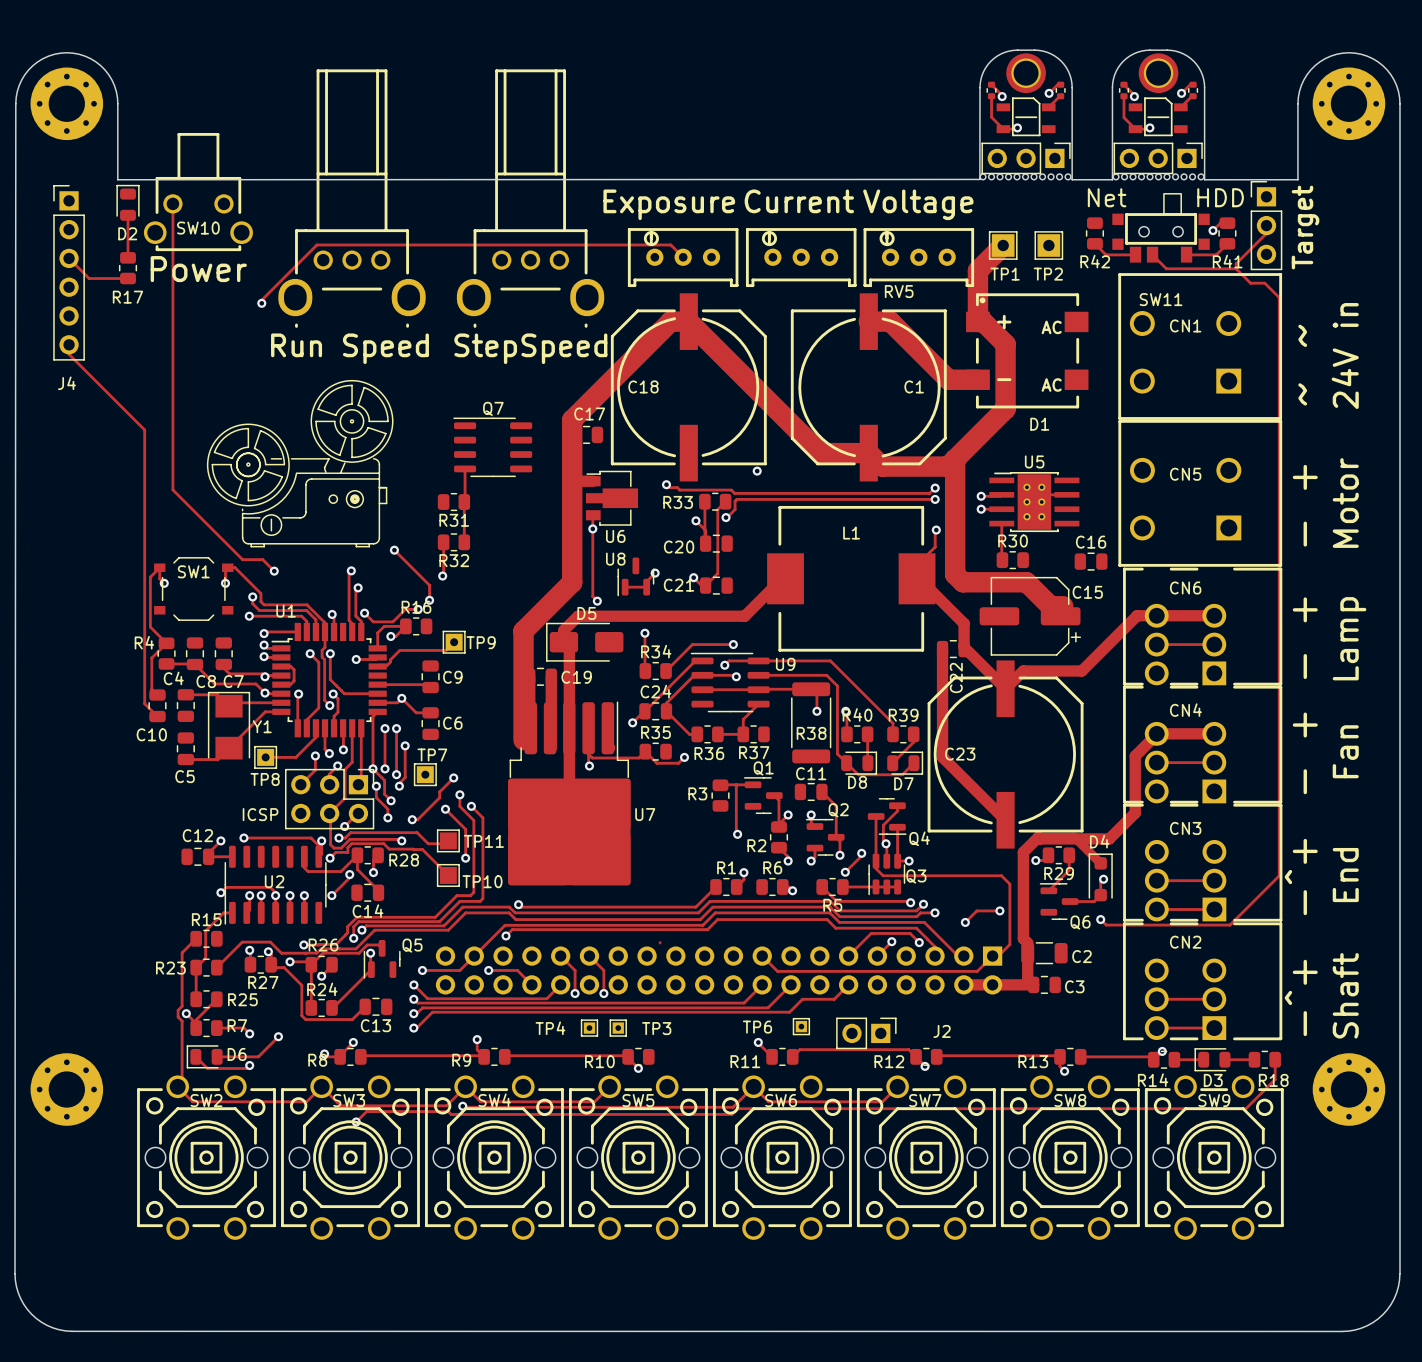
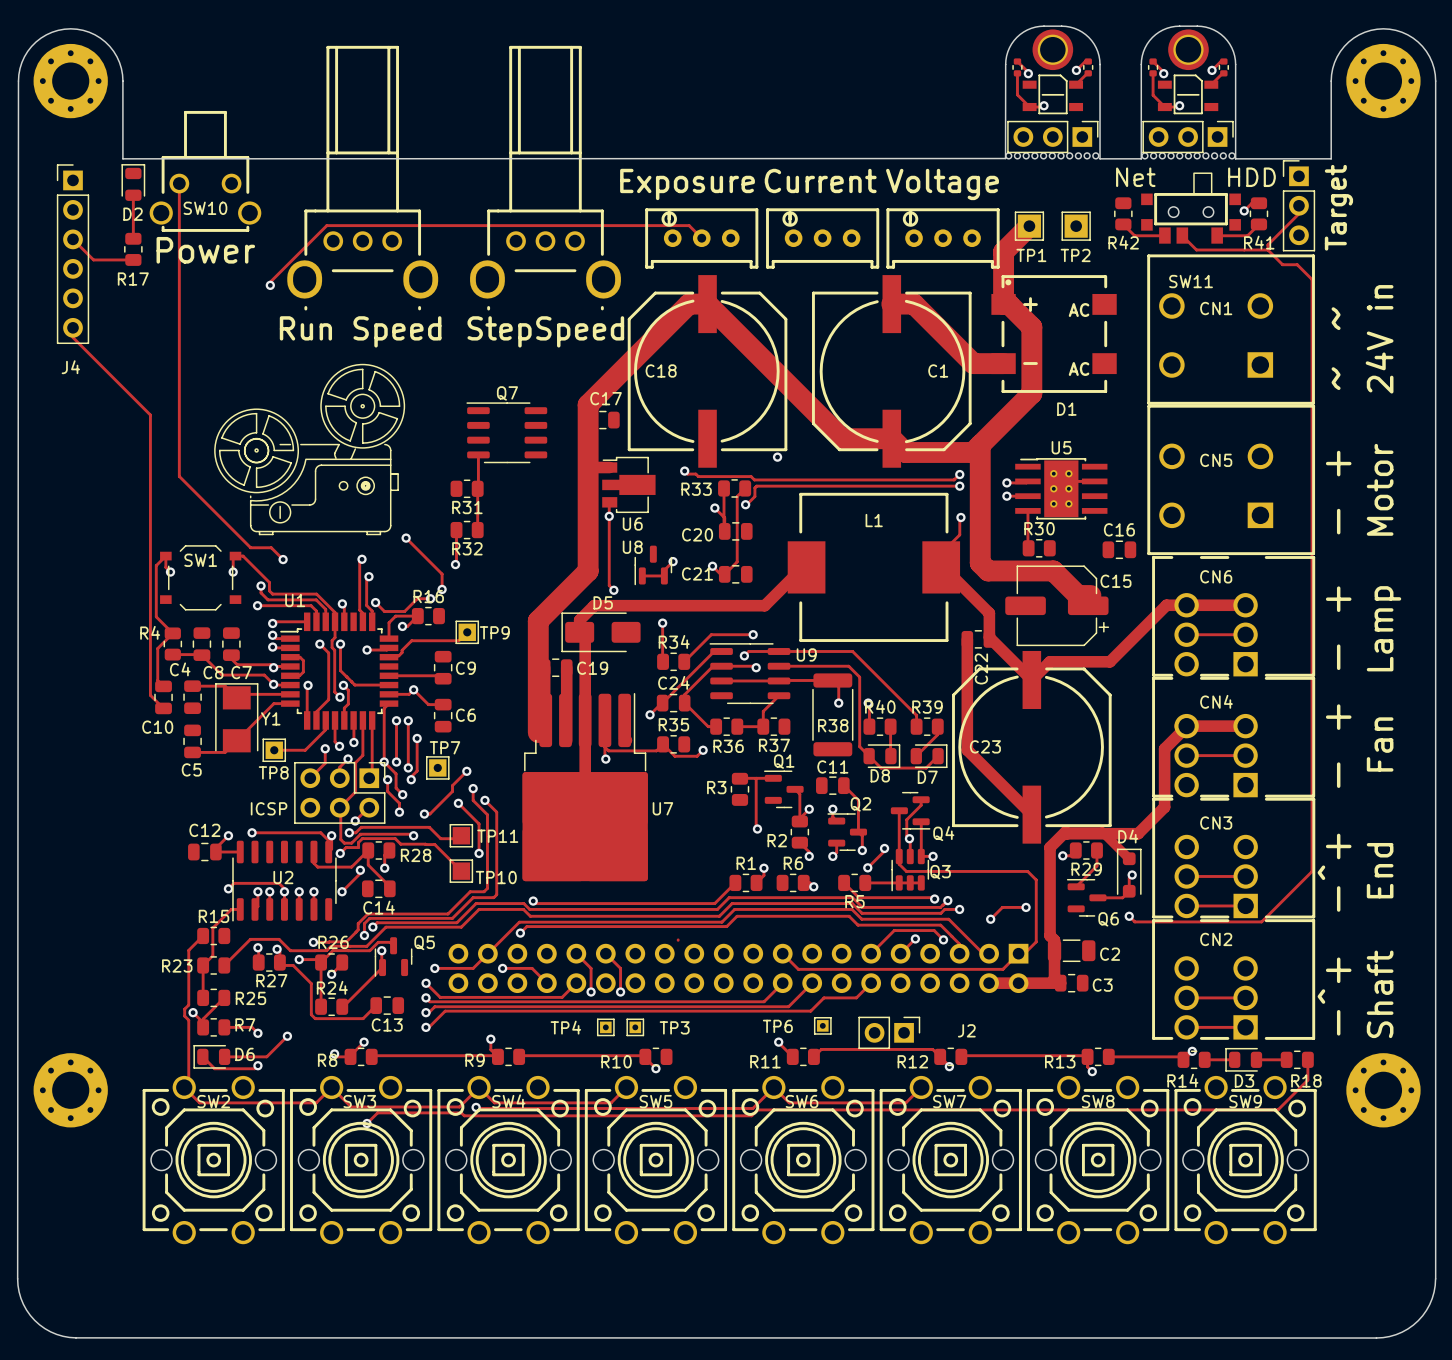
RV5 name: RV5 (899, 291) -> none

